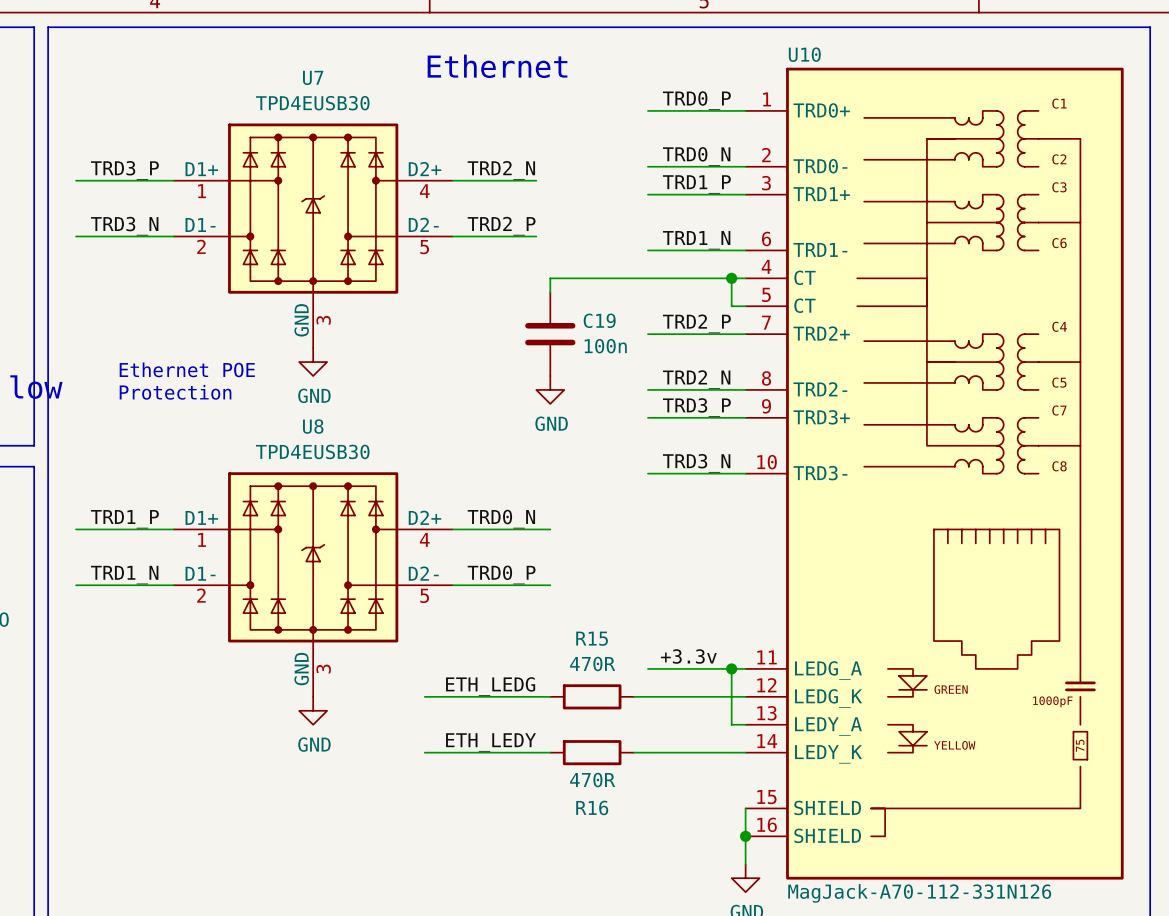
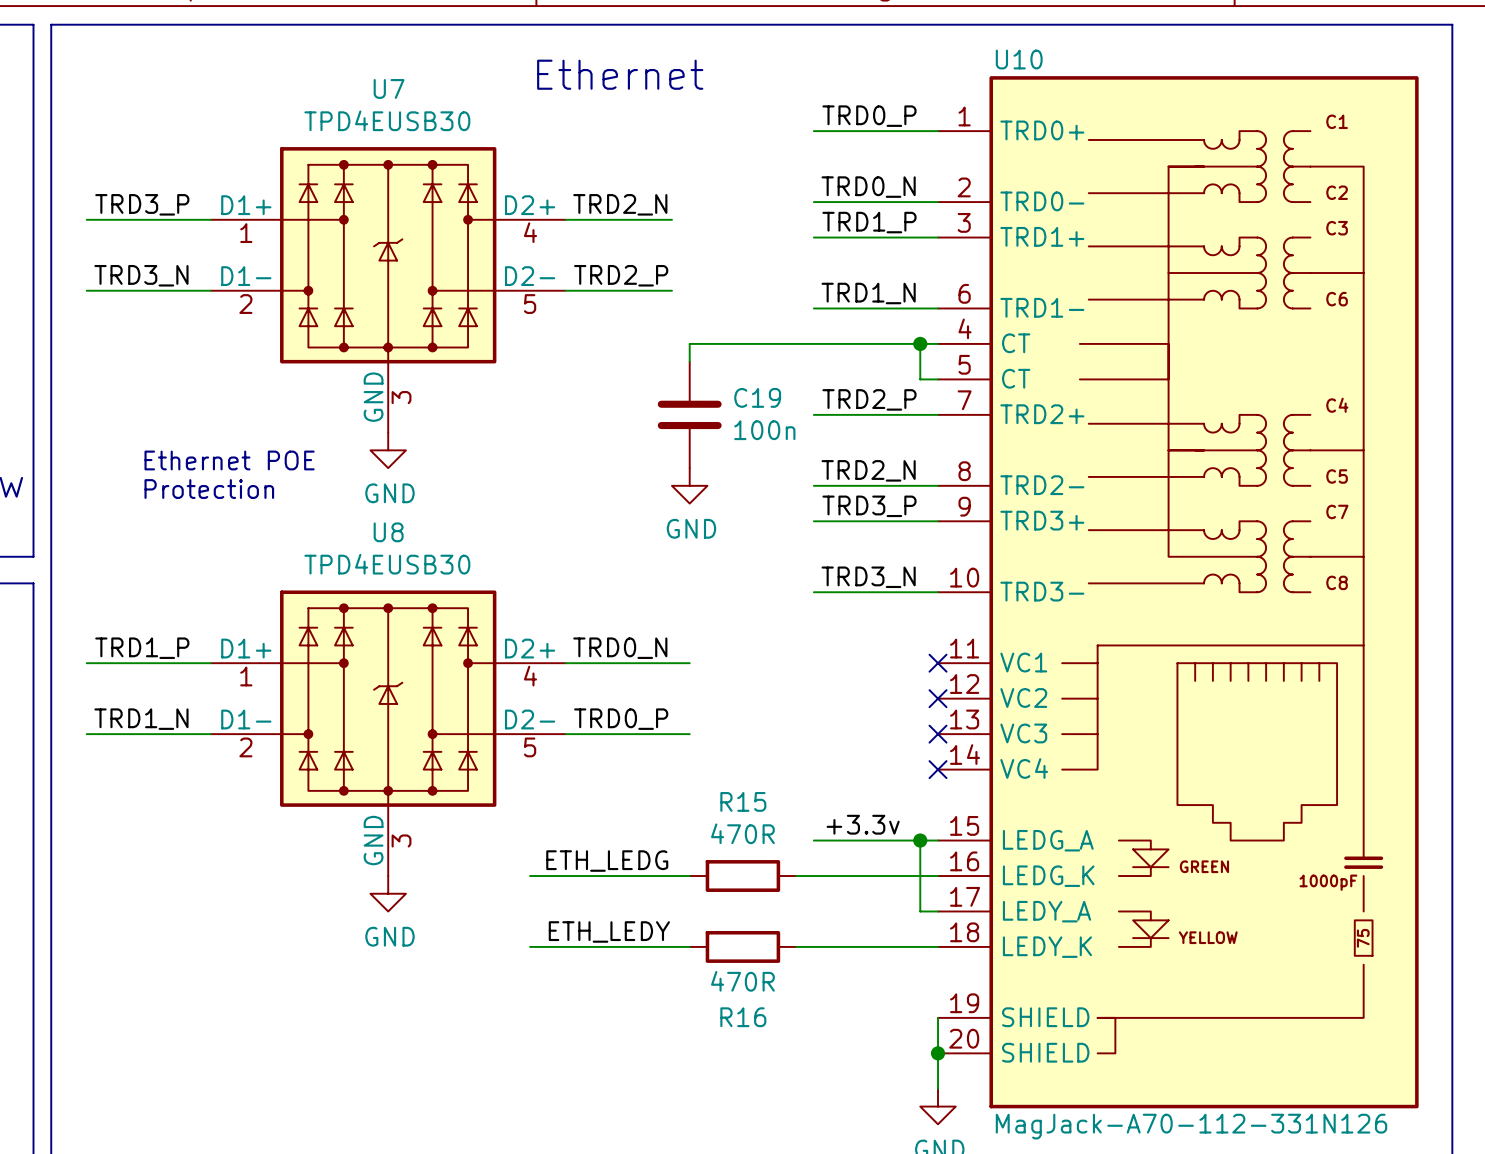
U10 symbol: [745, 67, 1124, 880] -> [938, 76, 1419, 1109]
no-connect mark: none -> (938, 663)
no-connect mark: none -> (938, 698)
no-connect mark: none -> (938, 734)
no-connect mark: none -> (938, 769)

